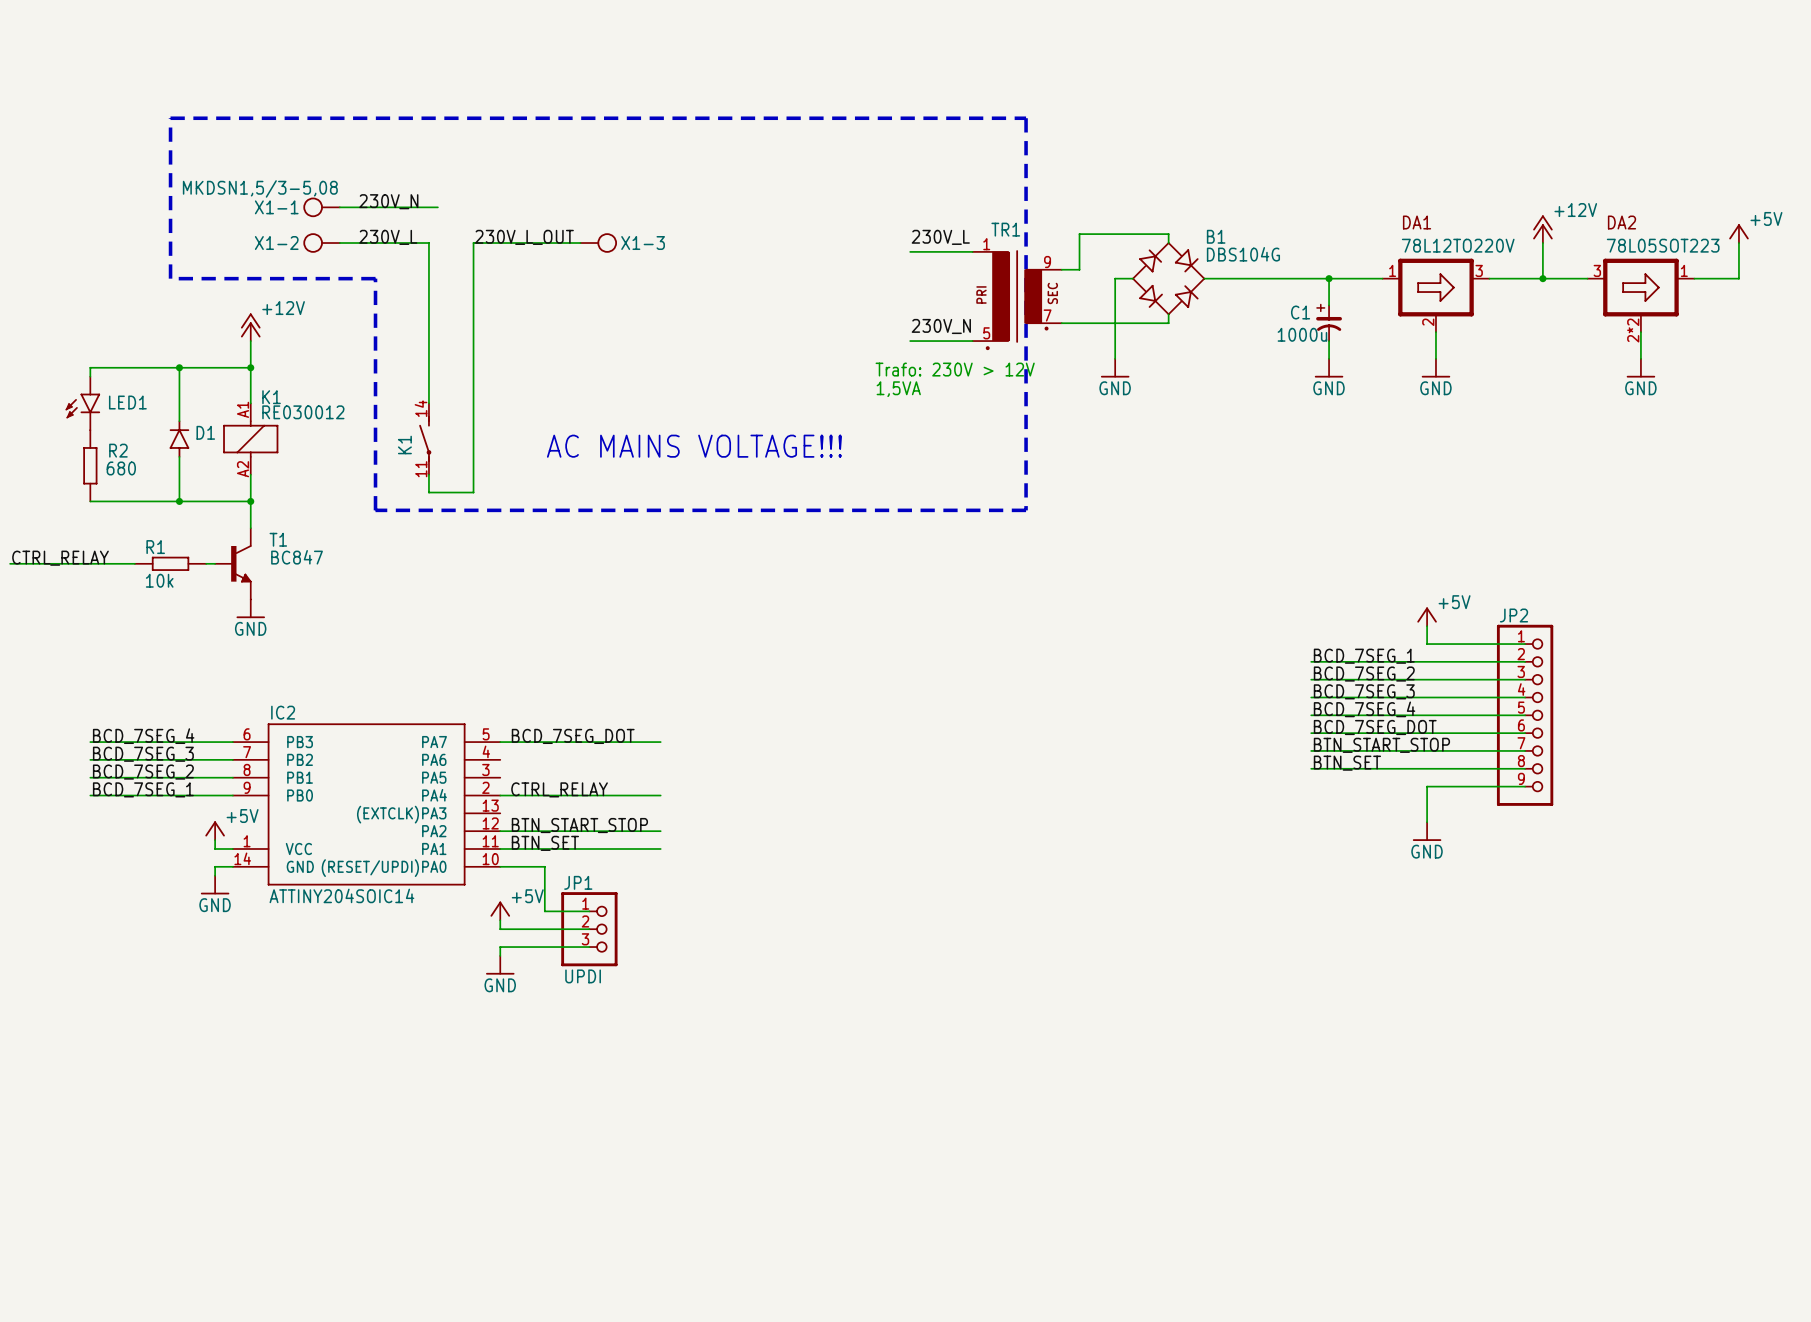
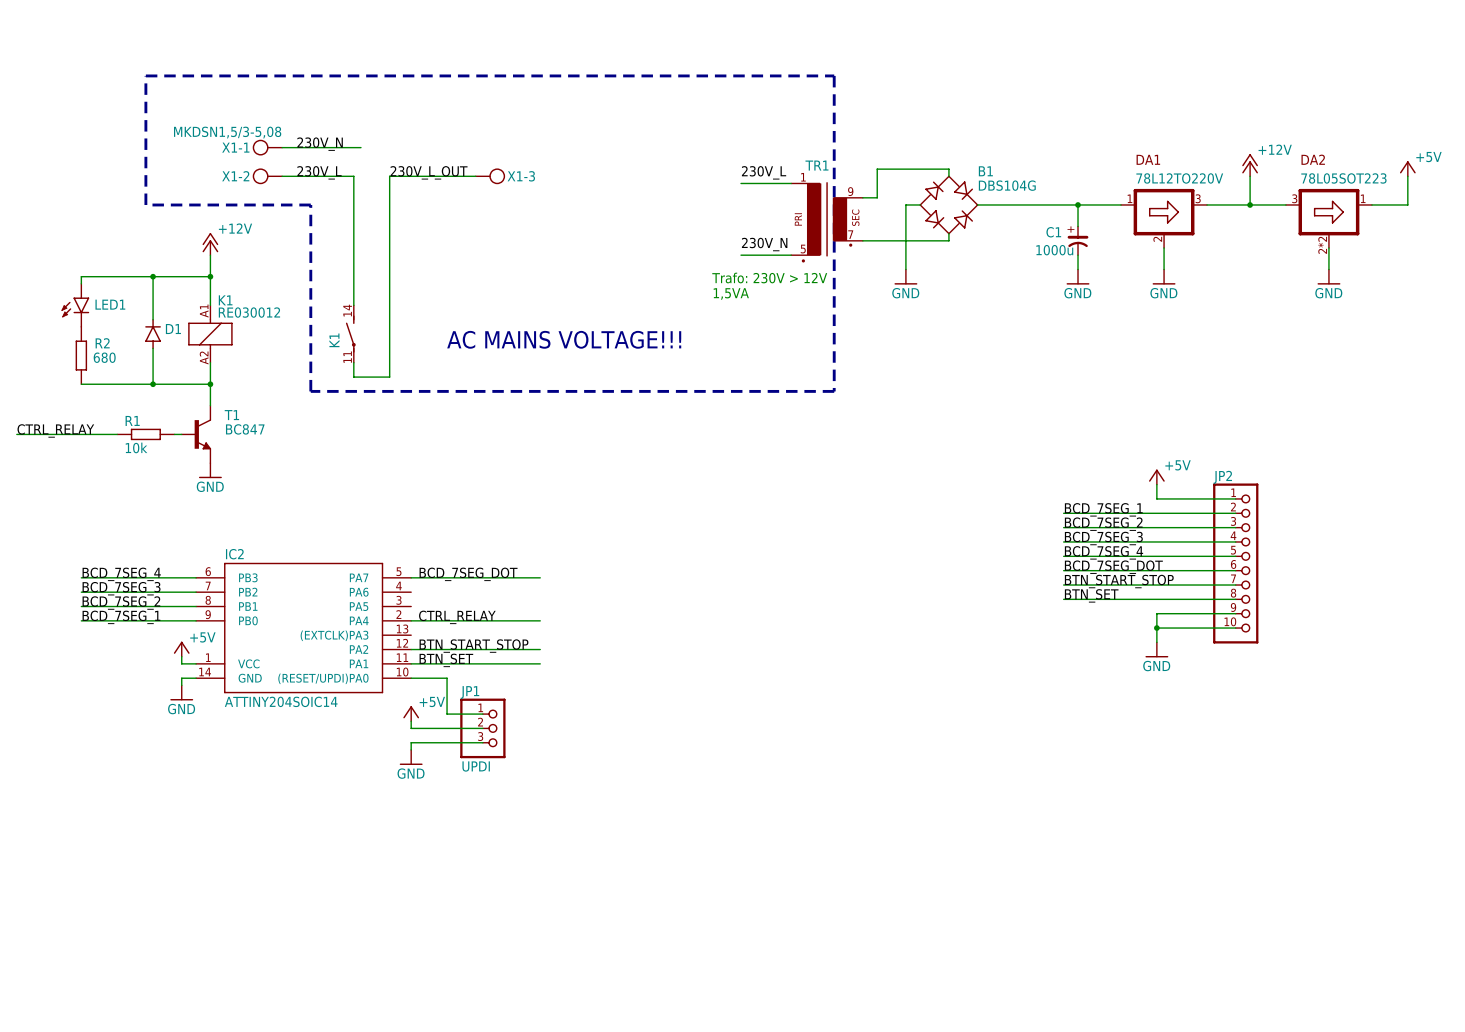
JP2 symbol: [1496, 624, 1554, 806] -> [1213, 483, 1259, 644]
wire: none -> (1156, 628) (1235, 628)
junction: none -> (1156, 628)

